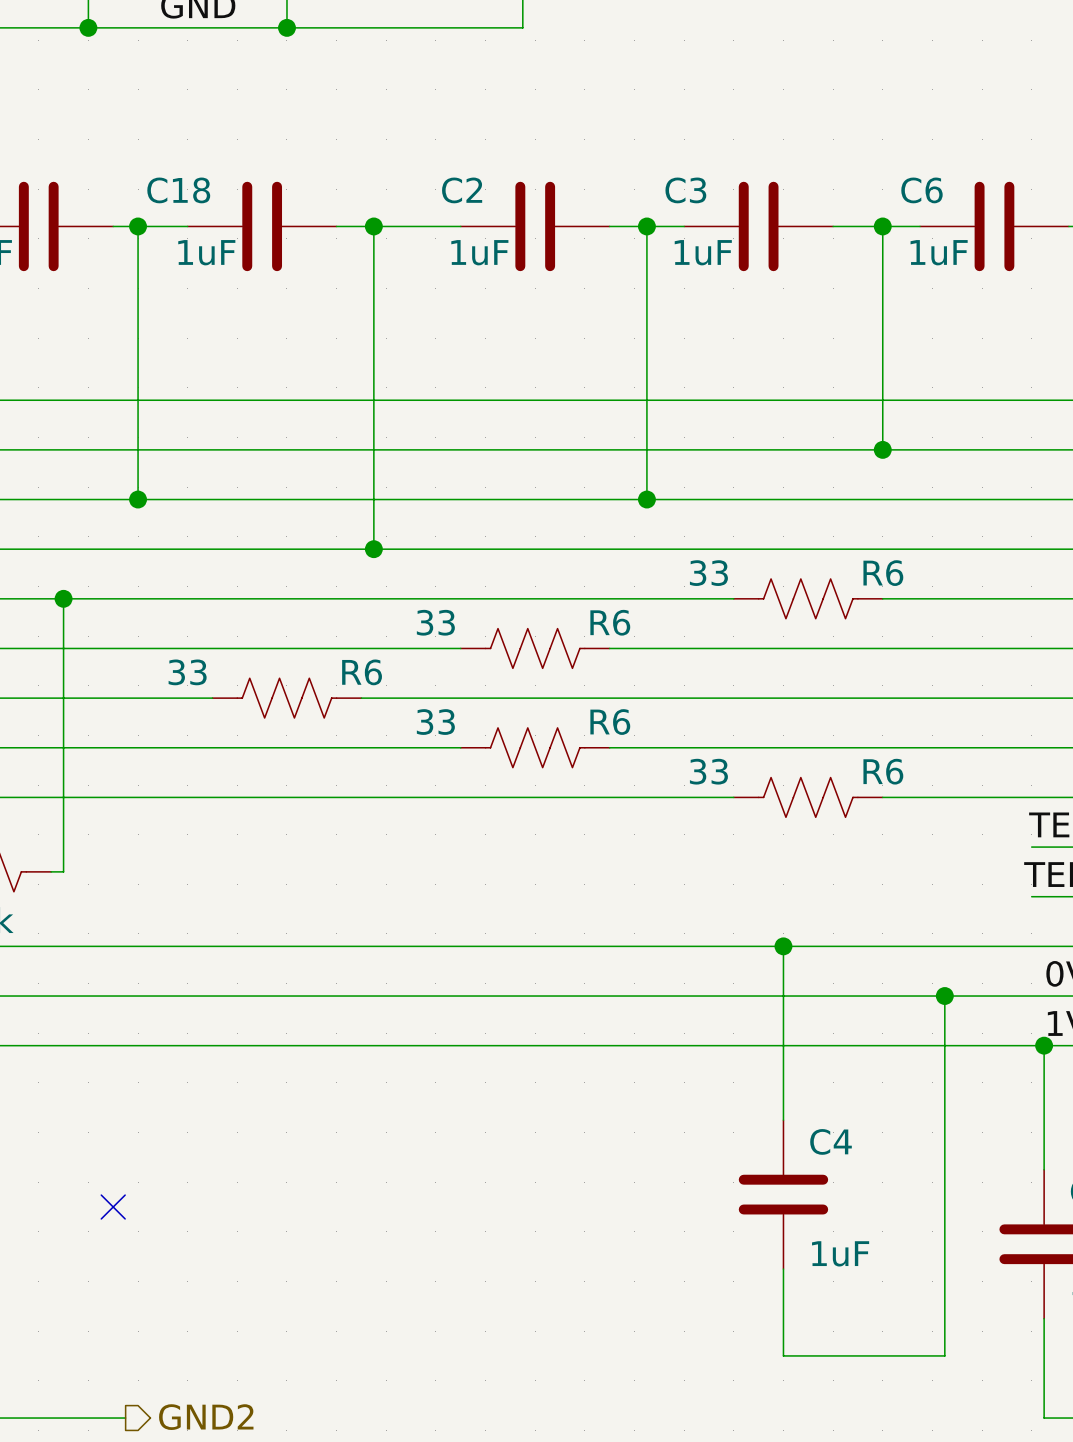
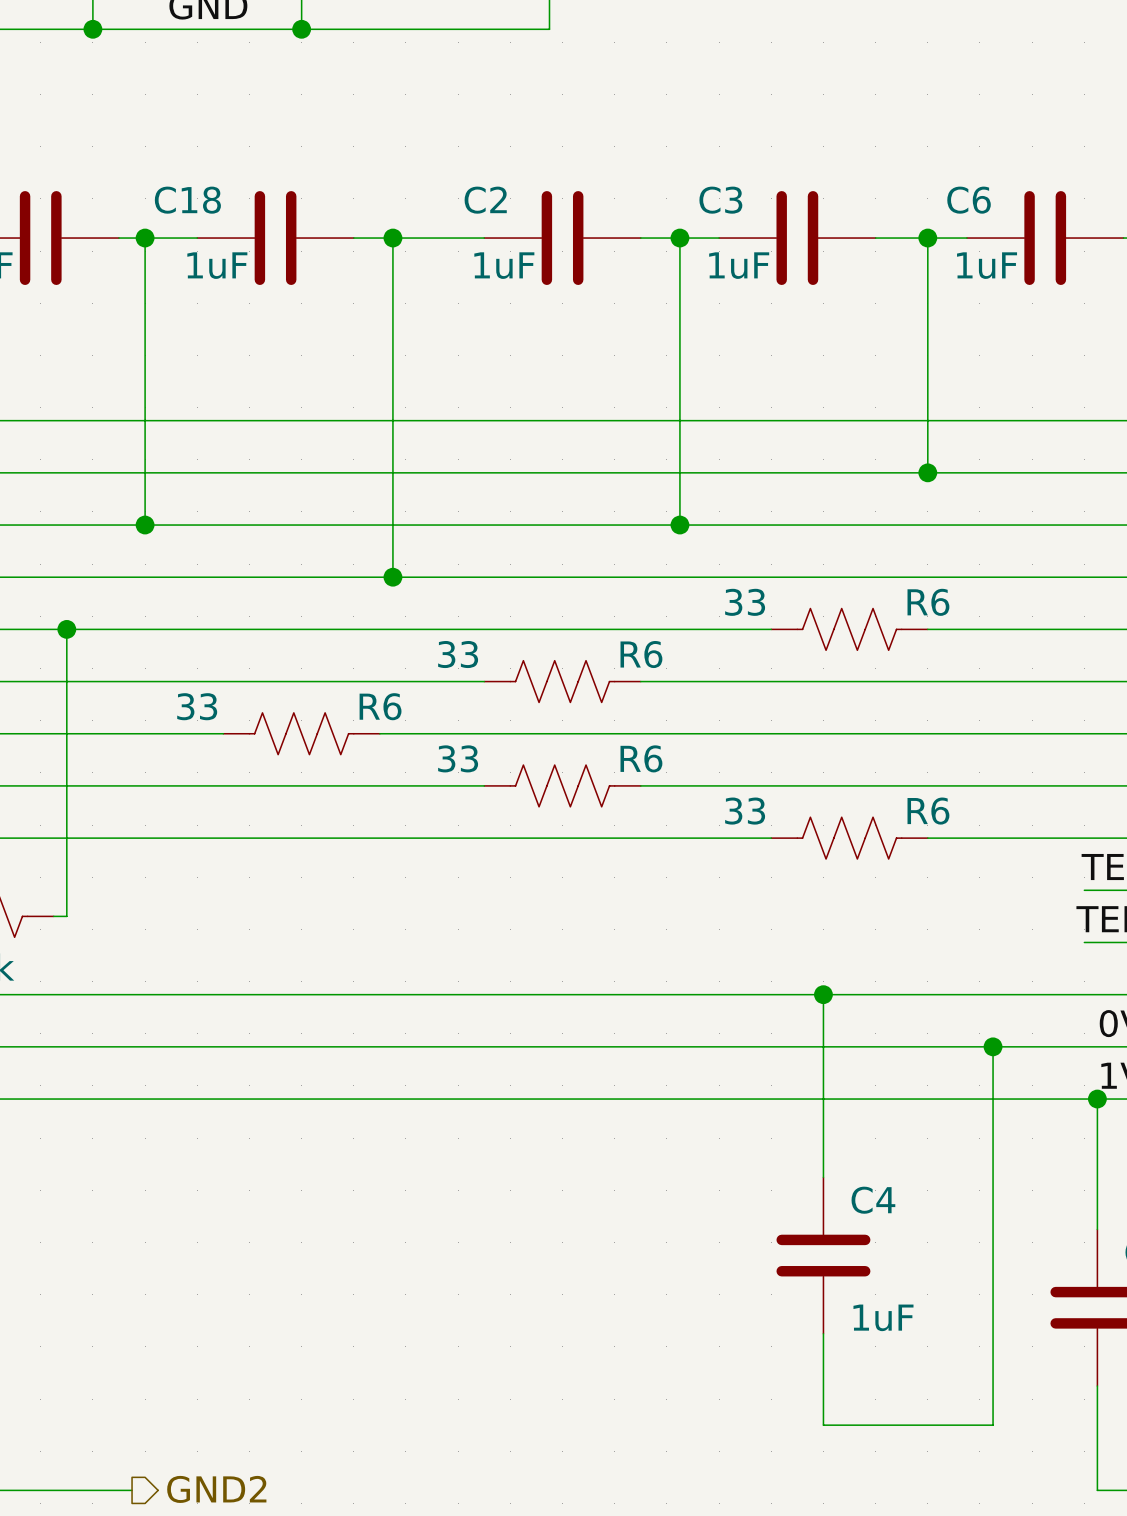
no-connect mark: (113, 1207) -> none

